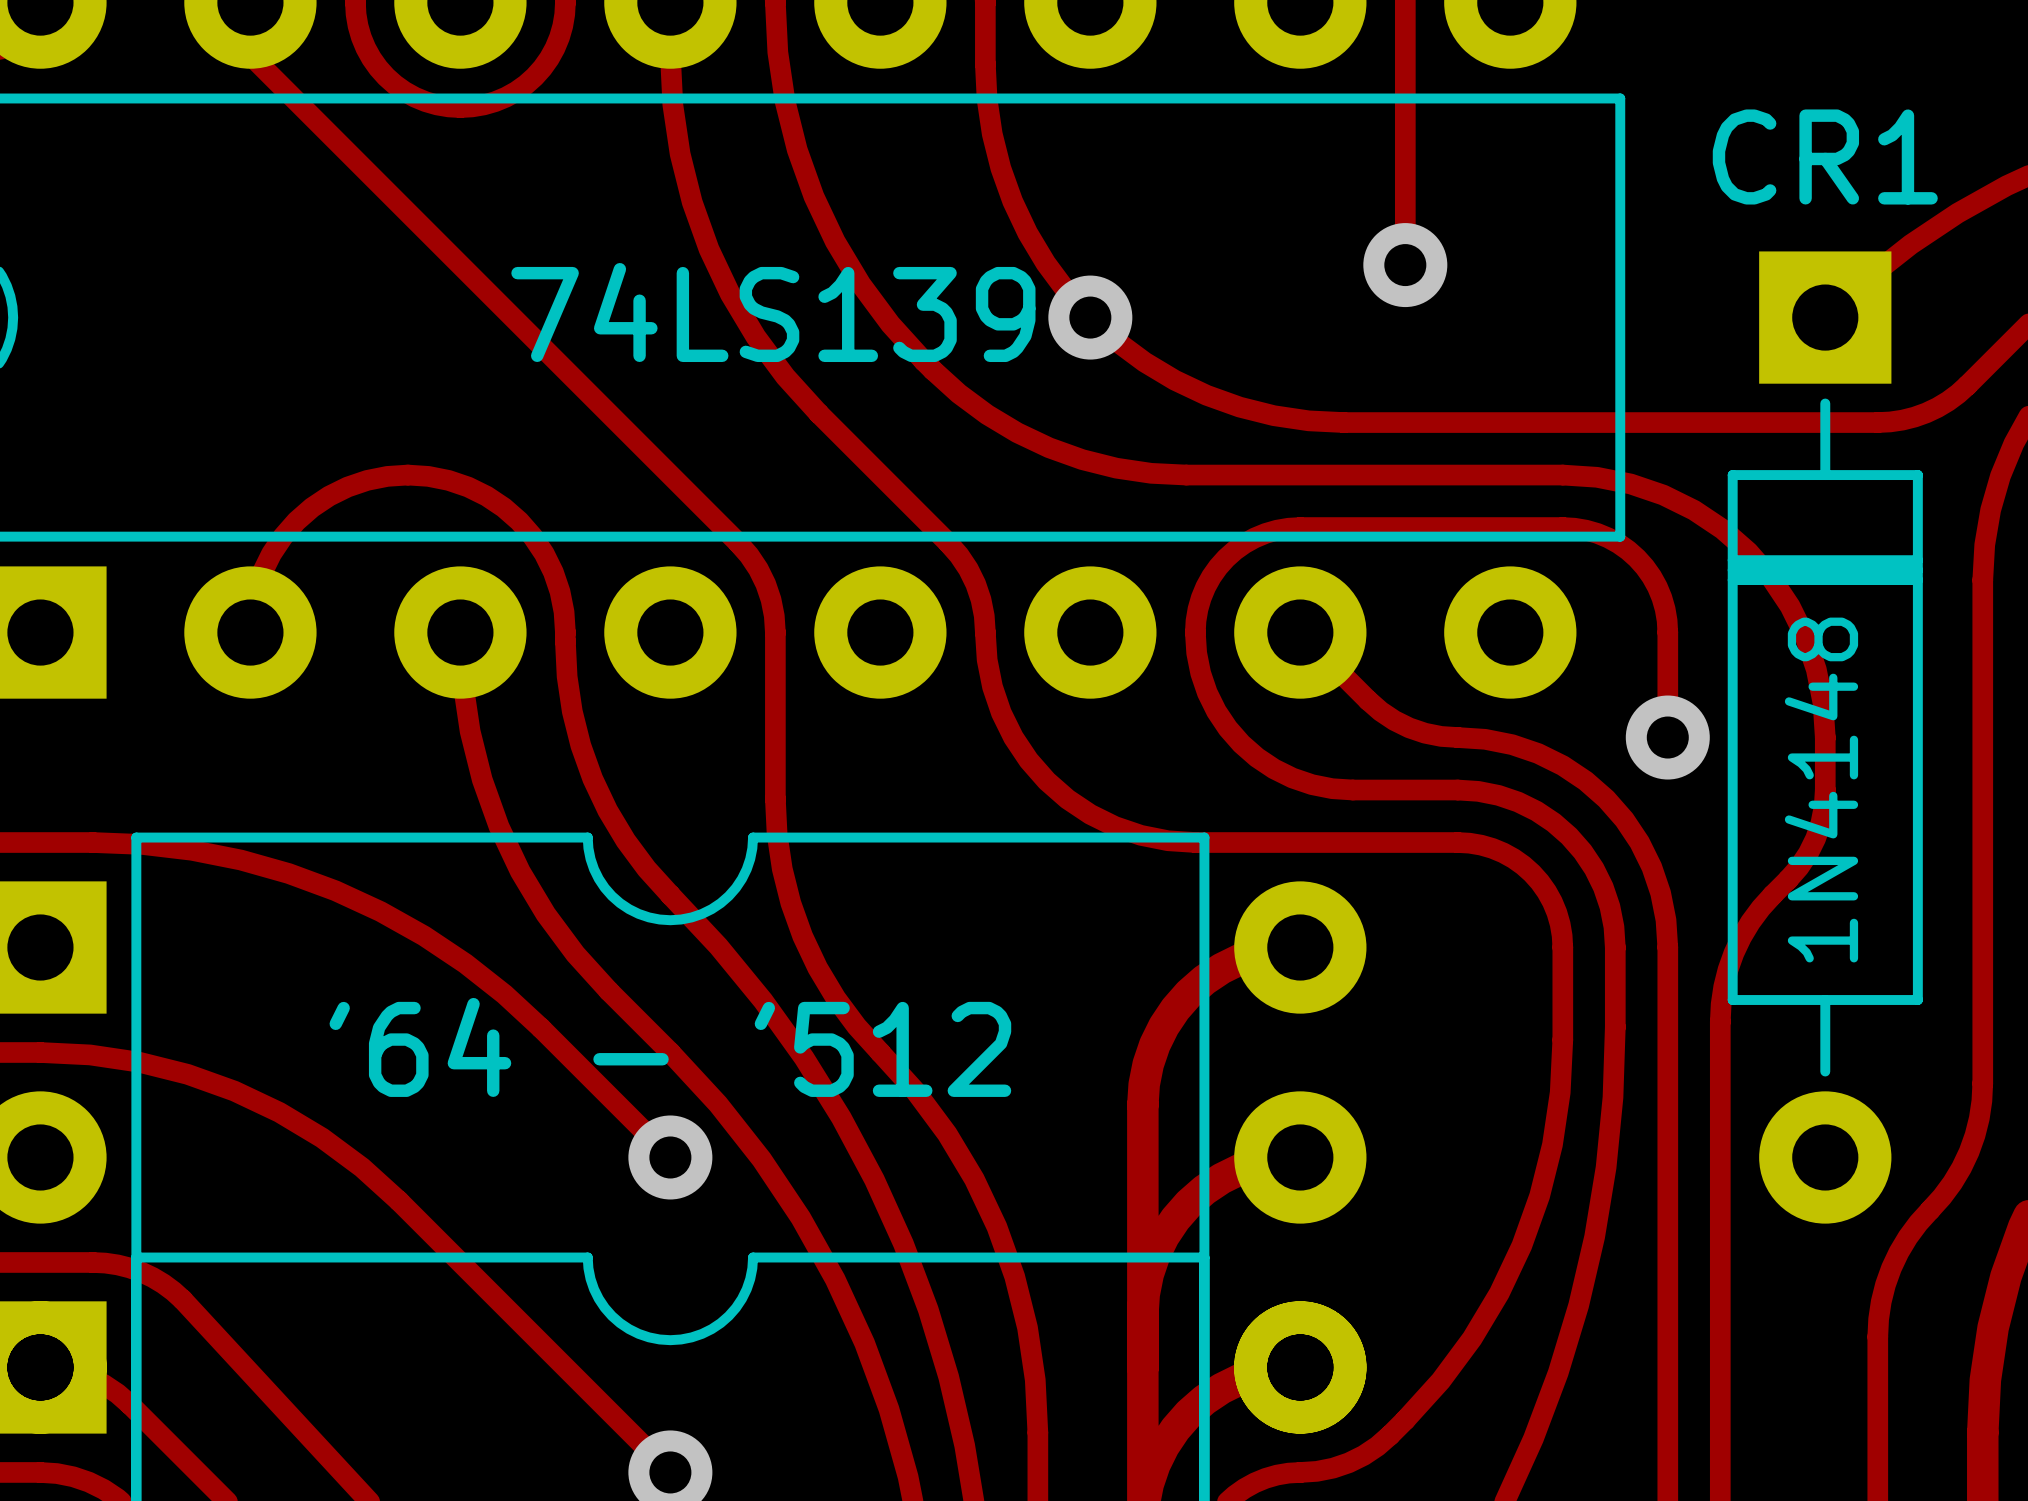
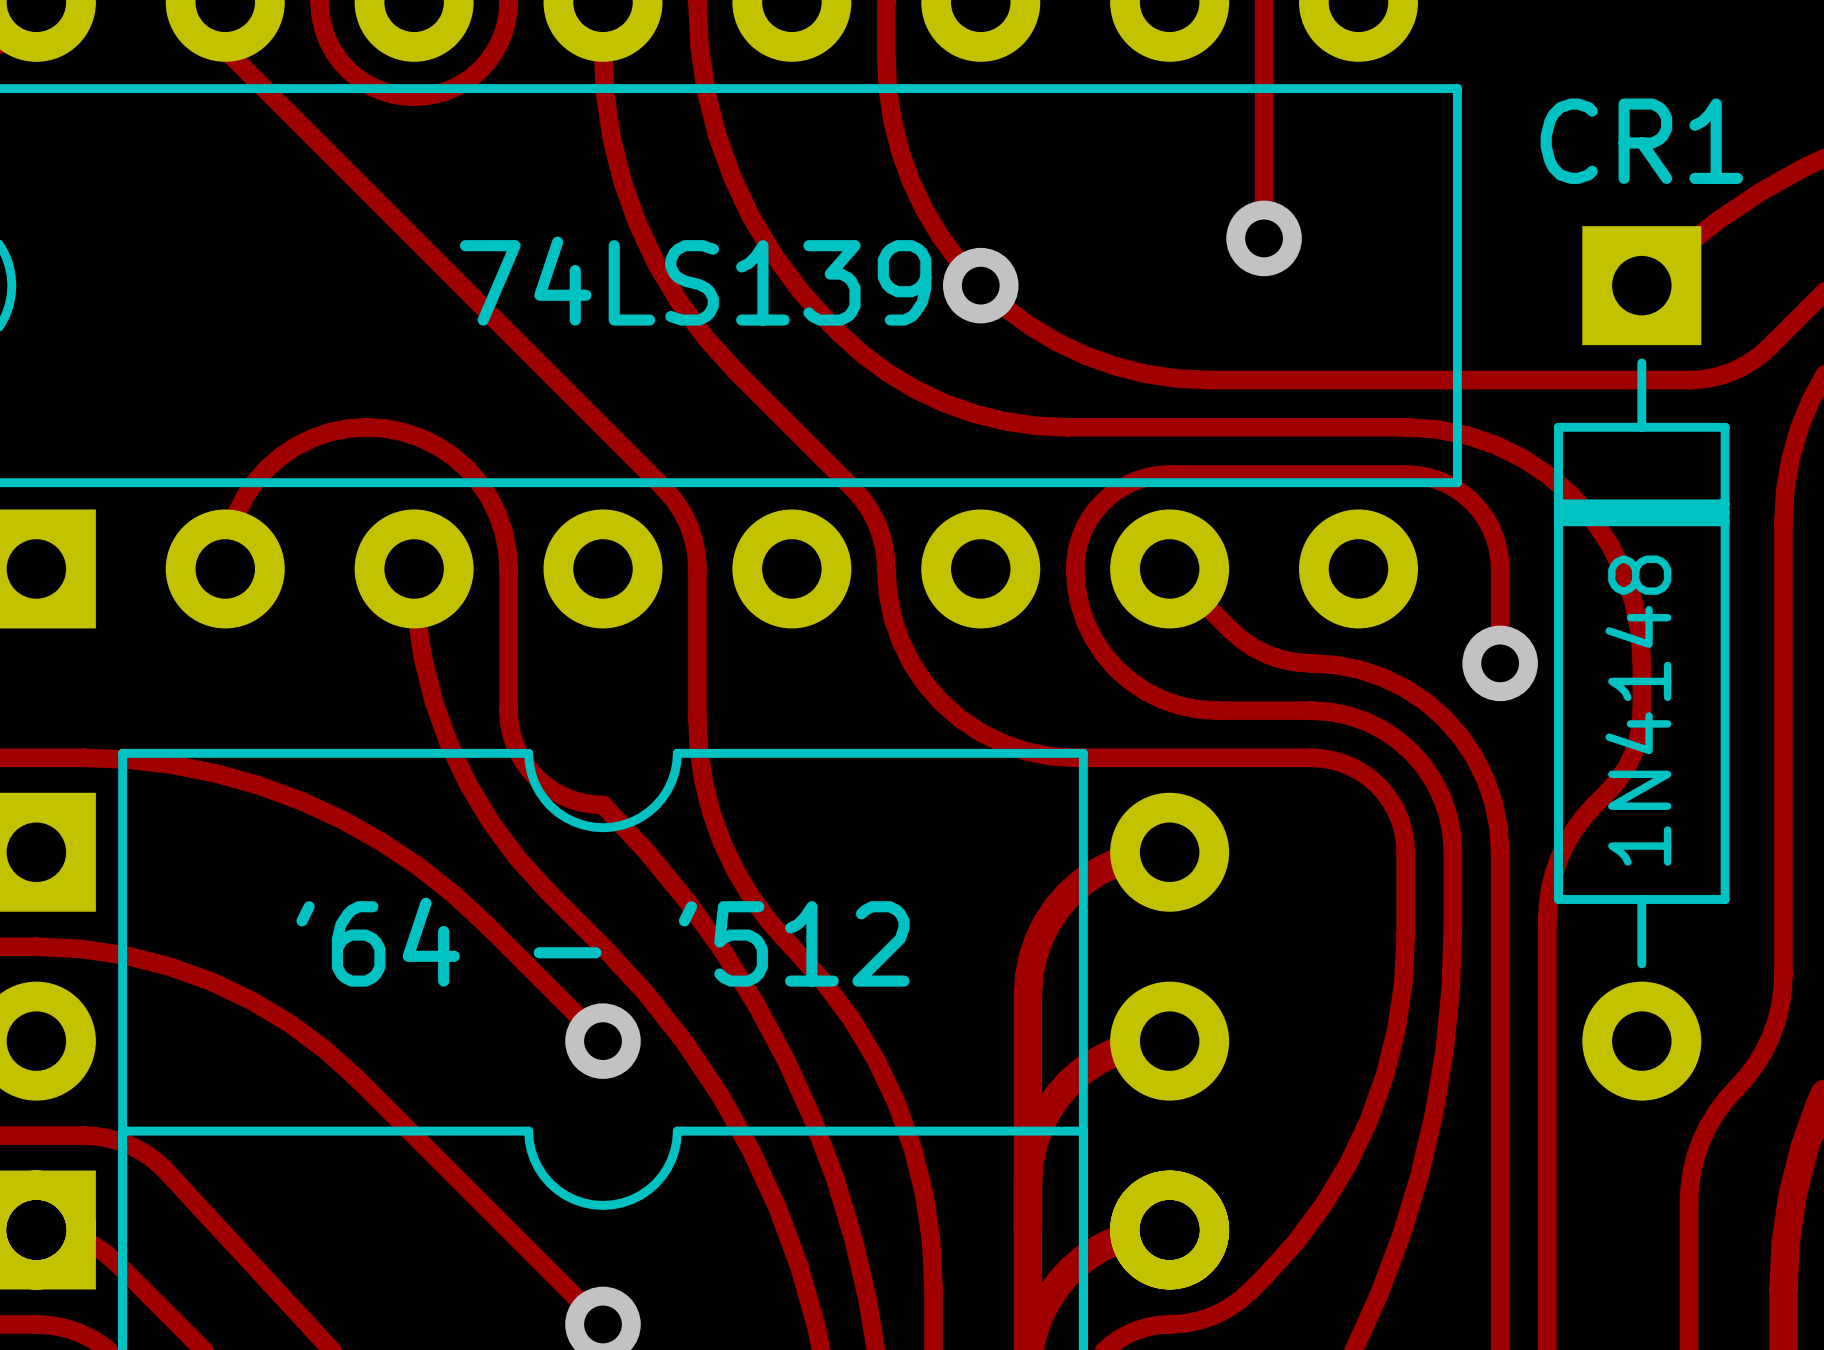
track: (565, 641) (567, 676) (572, 711) (580, 745) (592, 778) (607, 810) (625, 840) (646, 868) (670, 895) -> (508, 577) (508, 710) (510, 731) (517, 751) (536, 777) (552, 790) (581, 802) (603, 805)

